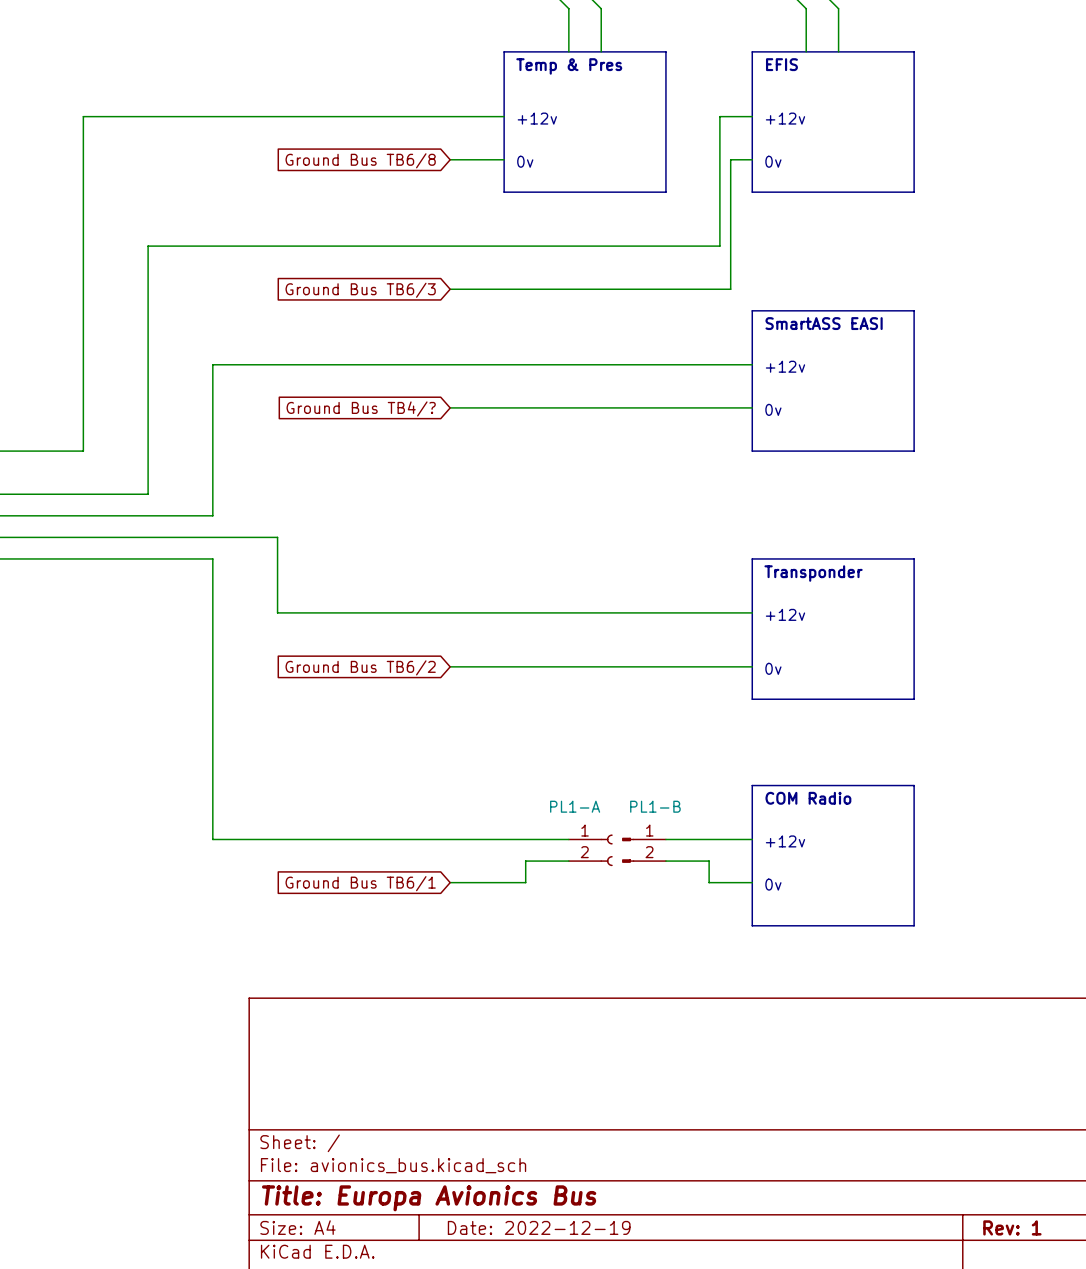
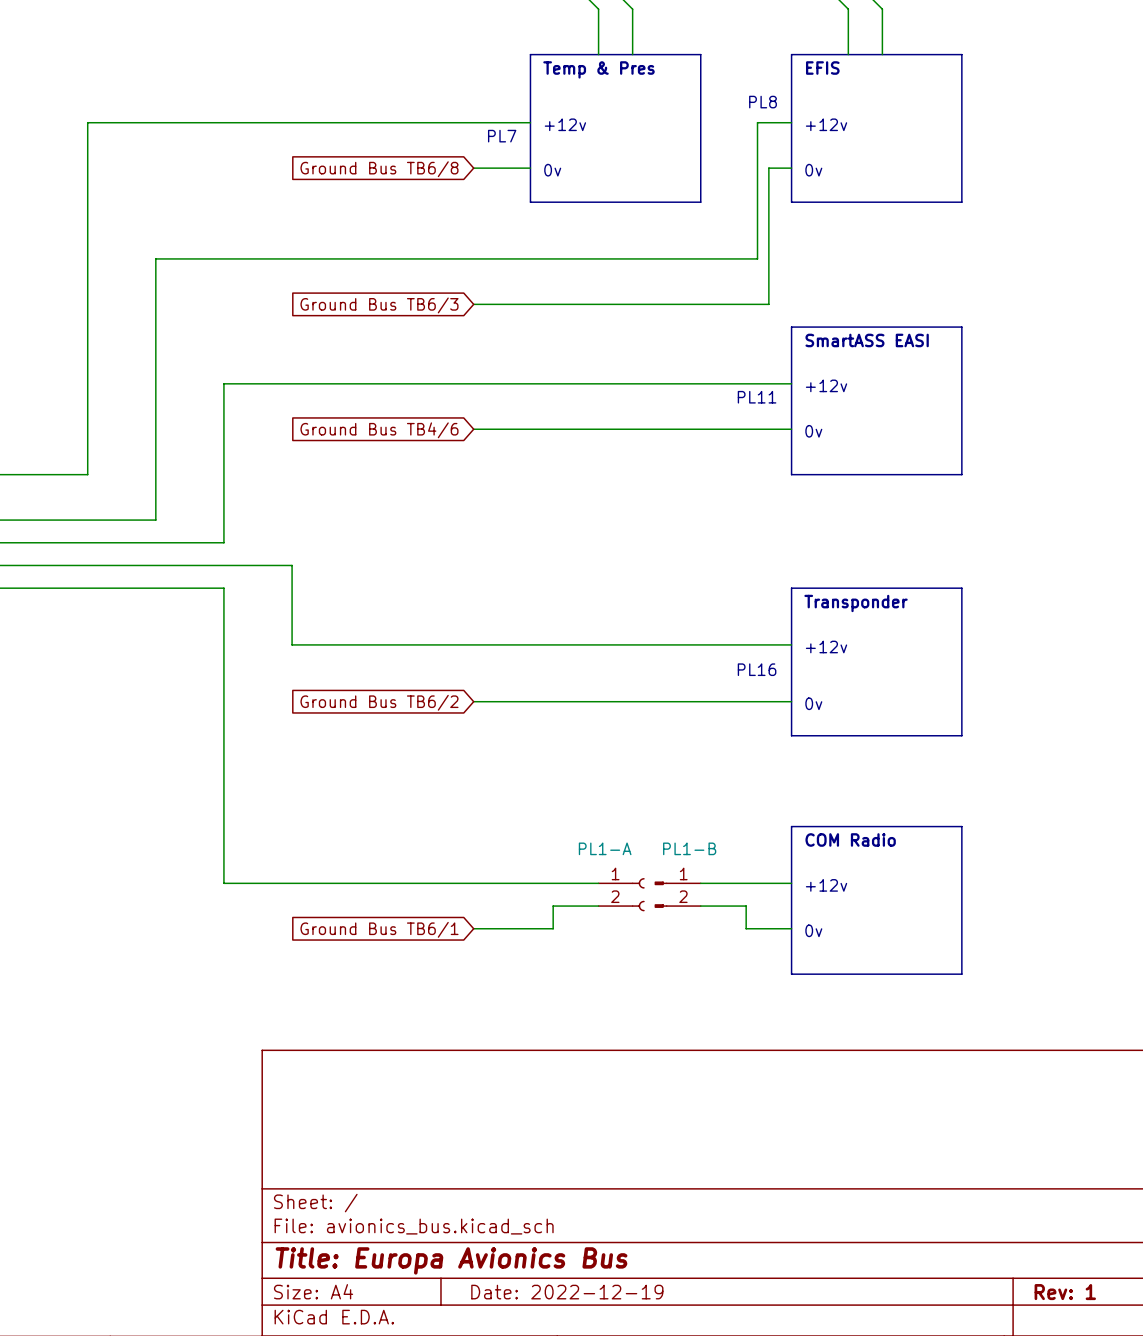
text: none -> PL8 (763, 102)
text: none -> PL7 (502, 136)
text: none -> PL11 (757, 397)
global label: Ground Bus TB4/? (361, 408) -> Ground Bus TB4/6 (379, 430)
text: none -> PL16 (757, 669)

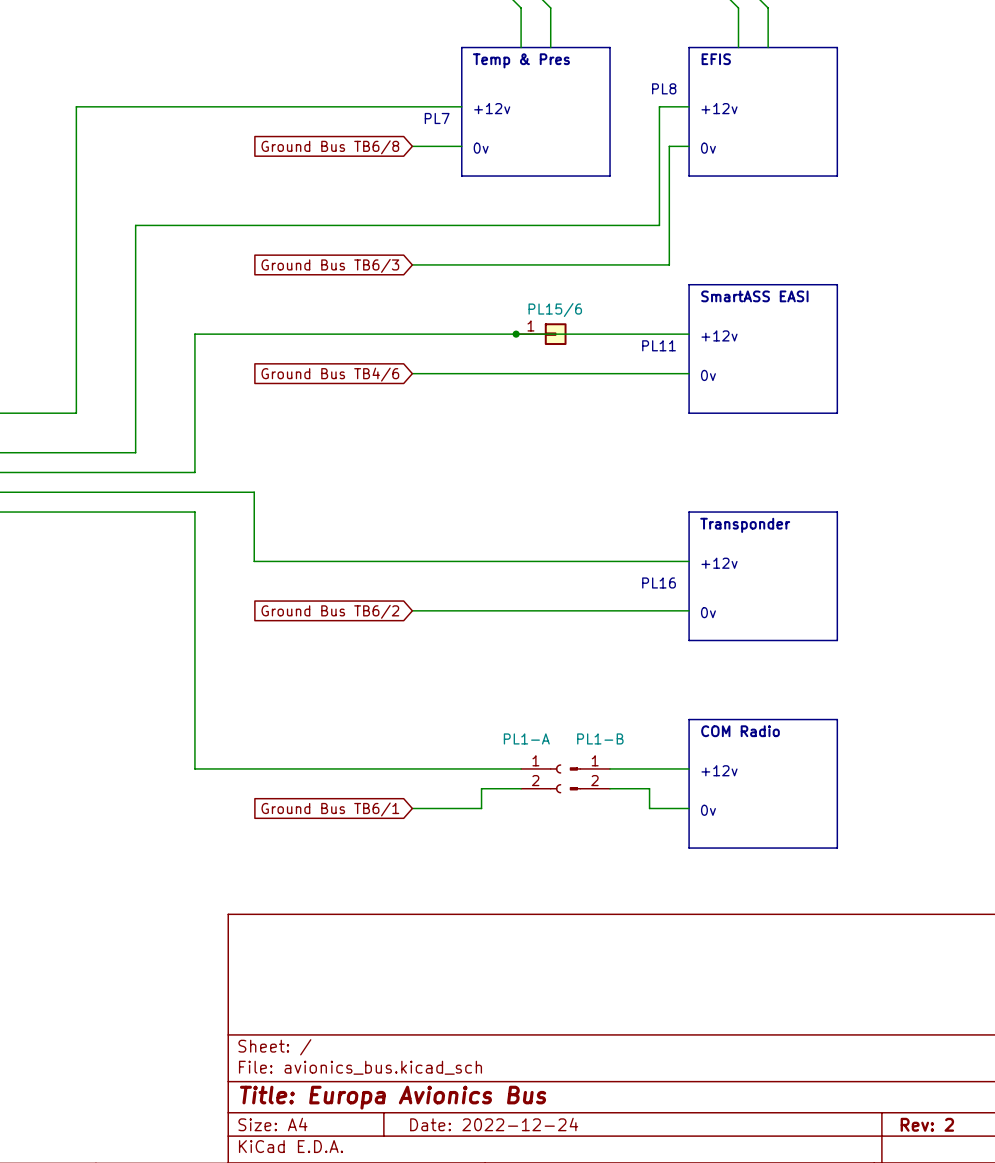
junction: none -> (516, 334)
PL15/6: none -> (541, 334)
title block: Date: 2022-12-19 (567, 1292) -> Date: 2022-12-24 (494, 1124)
title block: Rev: 1 (1065, 1292) -> Rev: 2 (927, 1124)

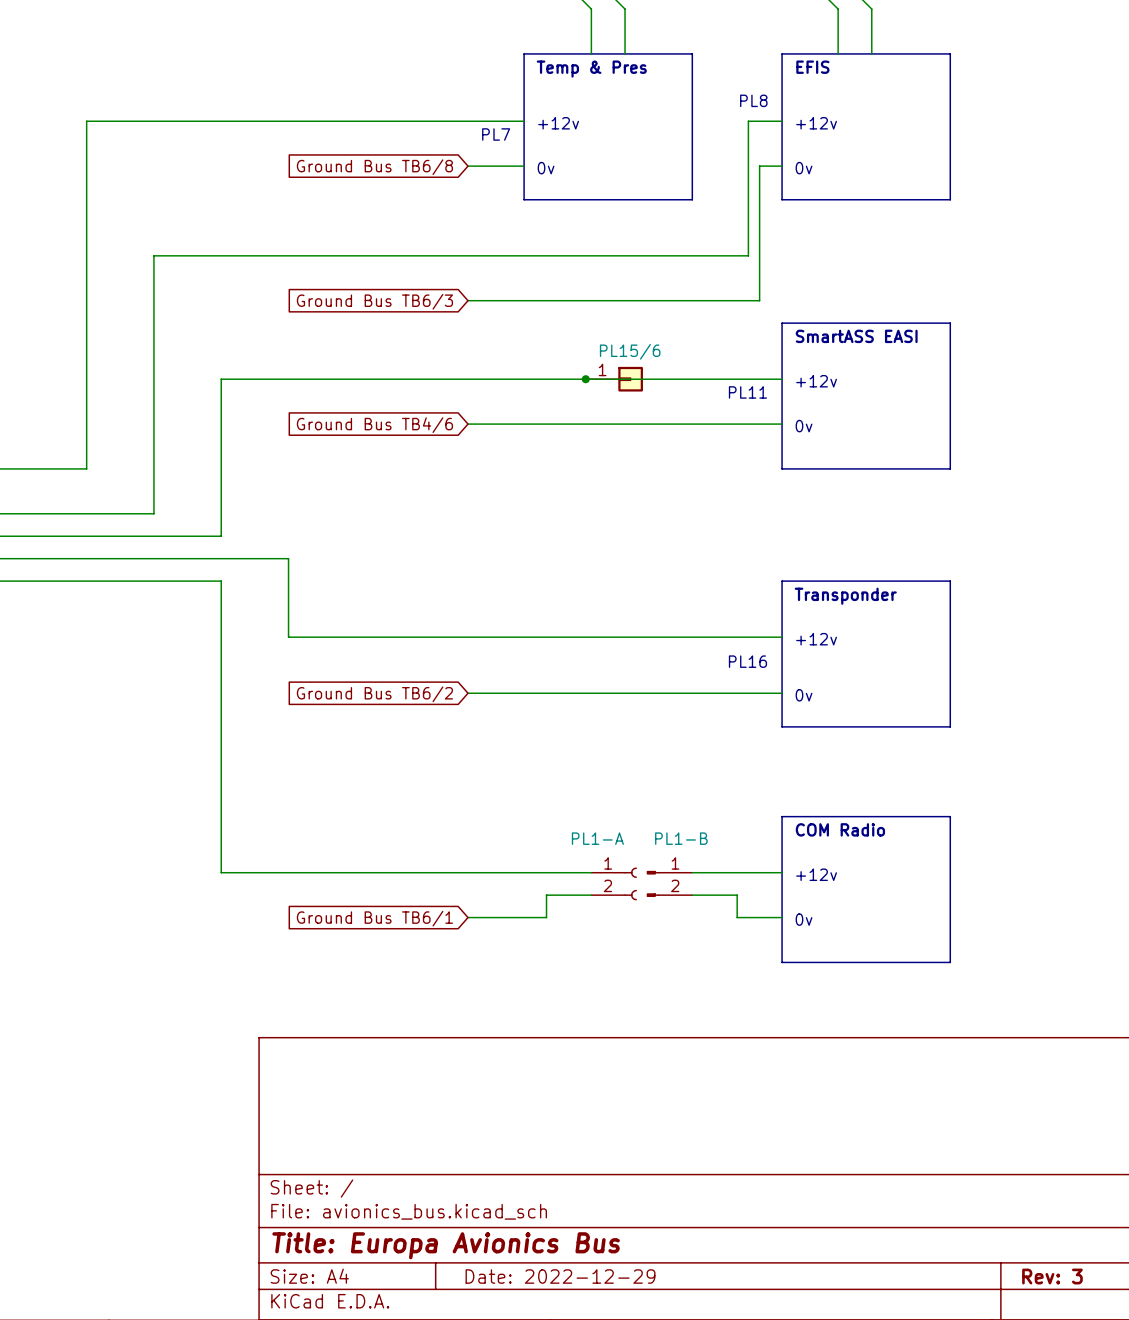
title block: Date: 2022-12-24 (494, 1124) -> Date: 2022-12-29 (560, 1276)
title block: Rev: 2 (927, 1124) -> Rev: 3 (1052, 1276)

